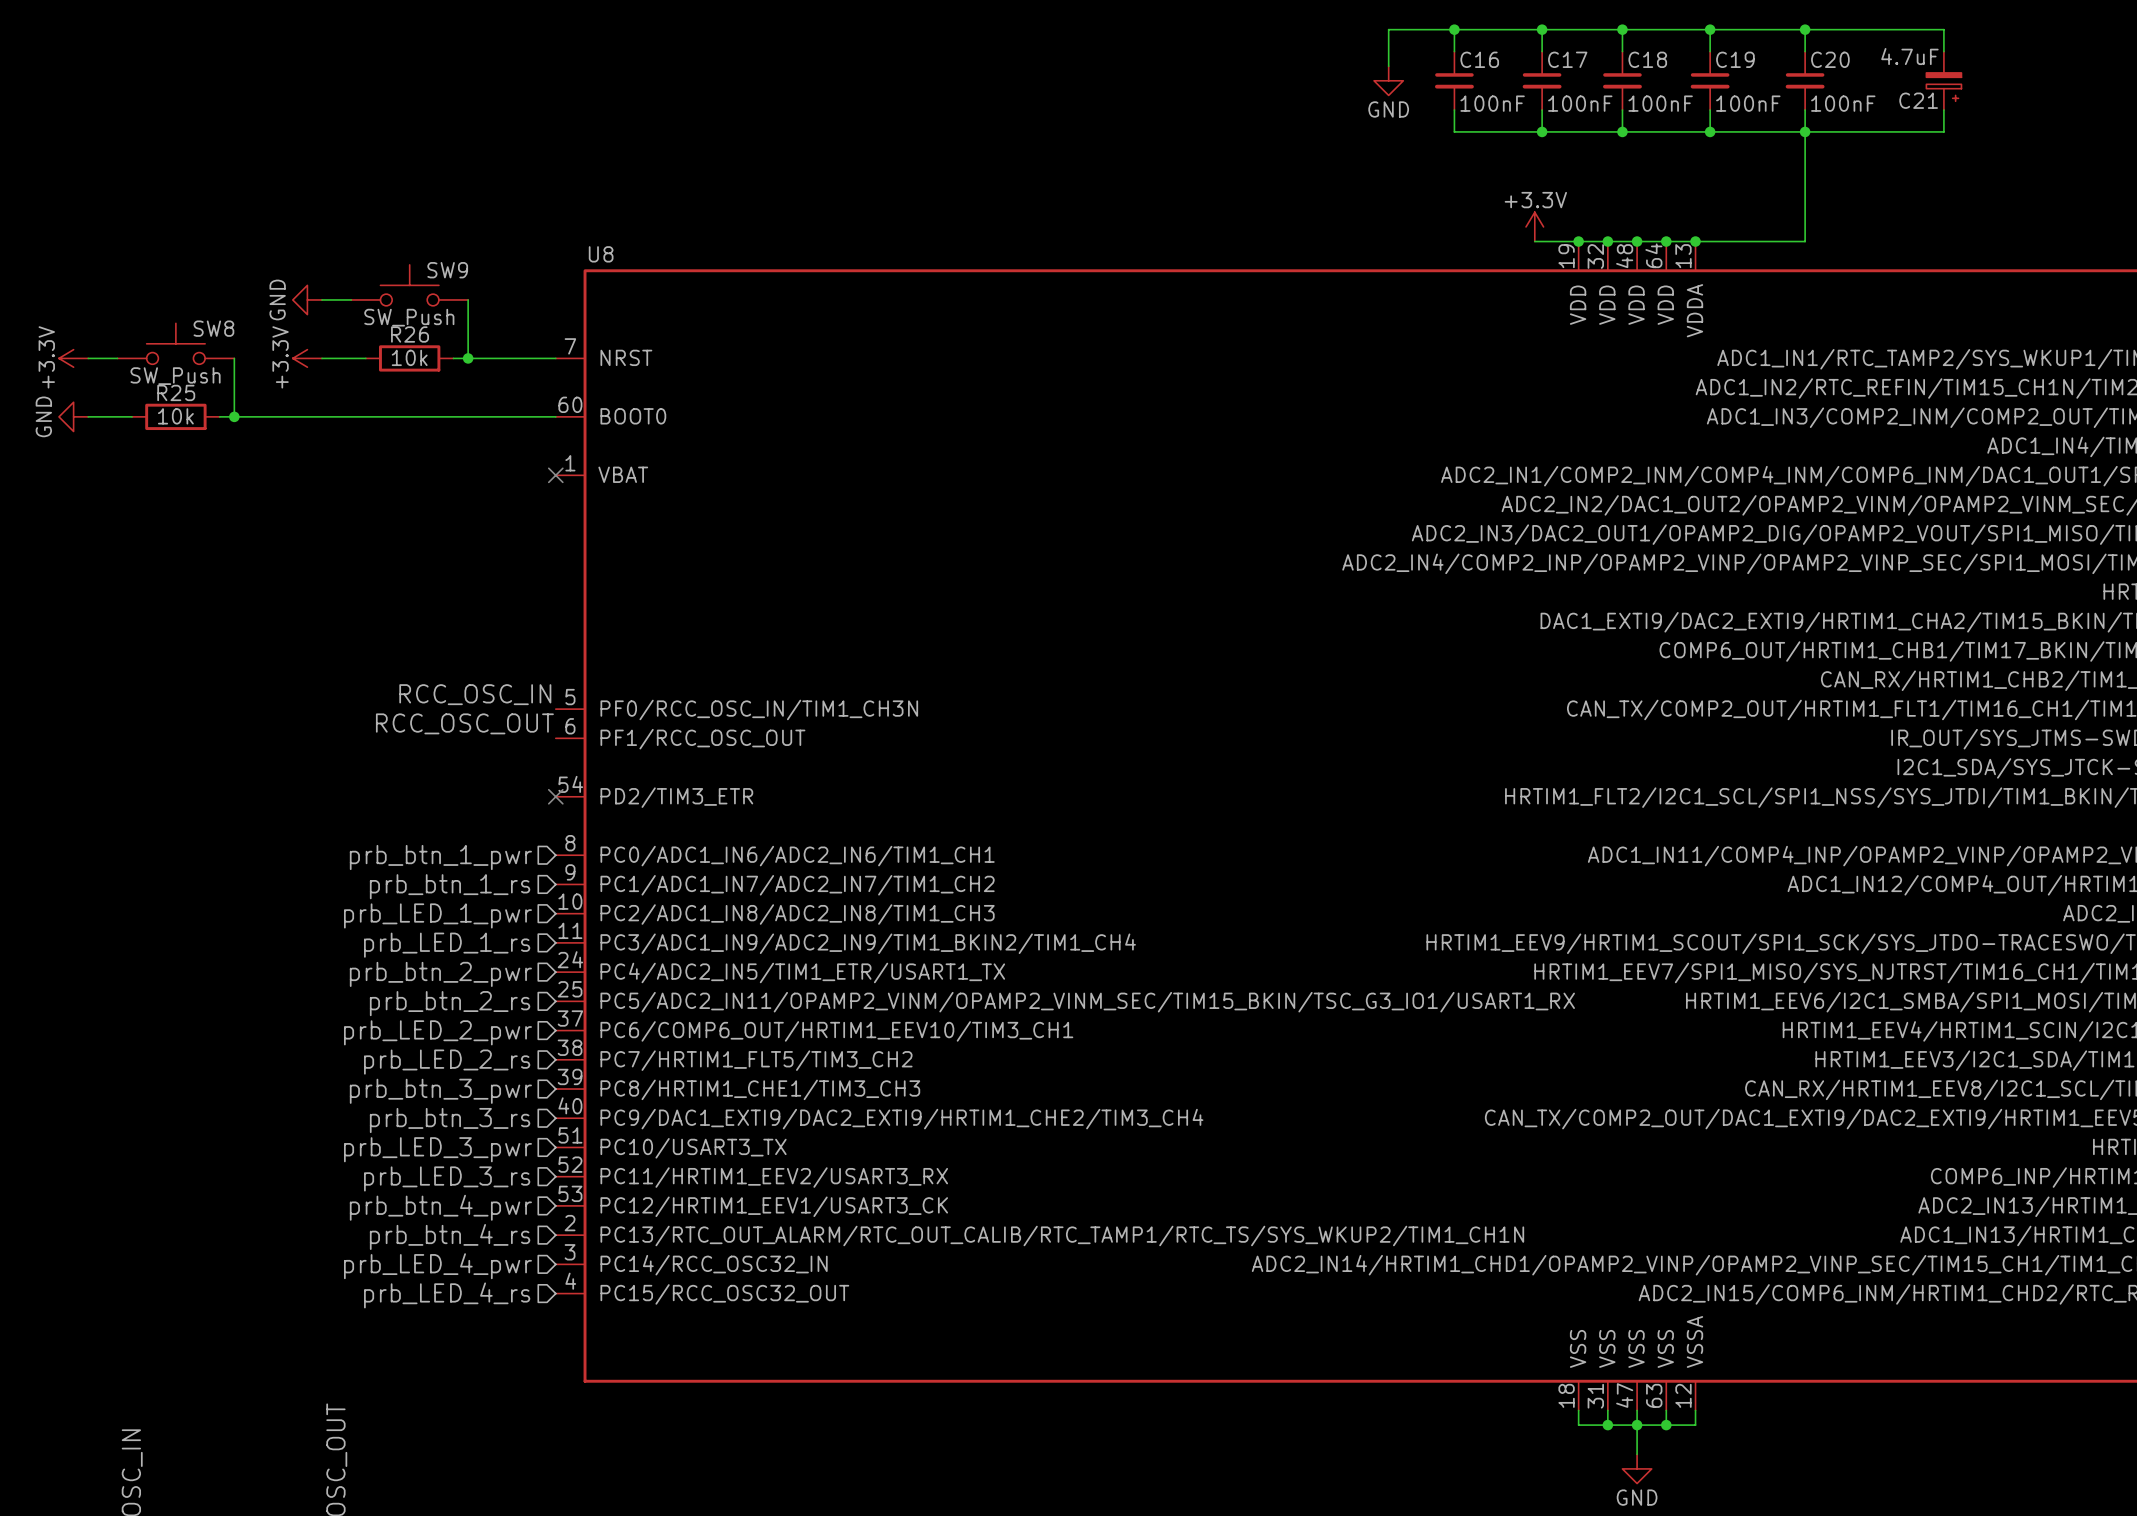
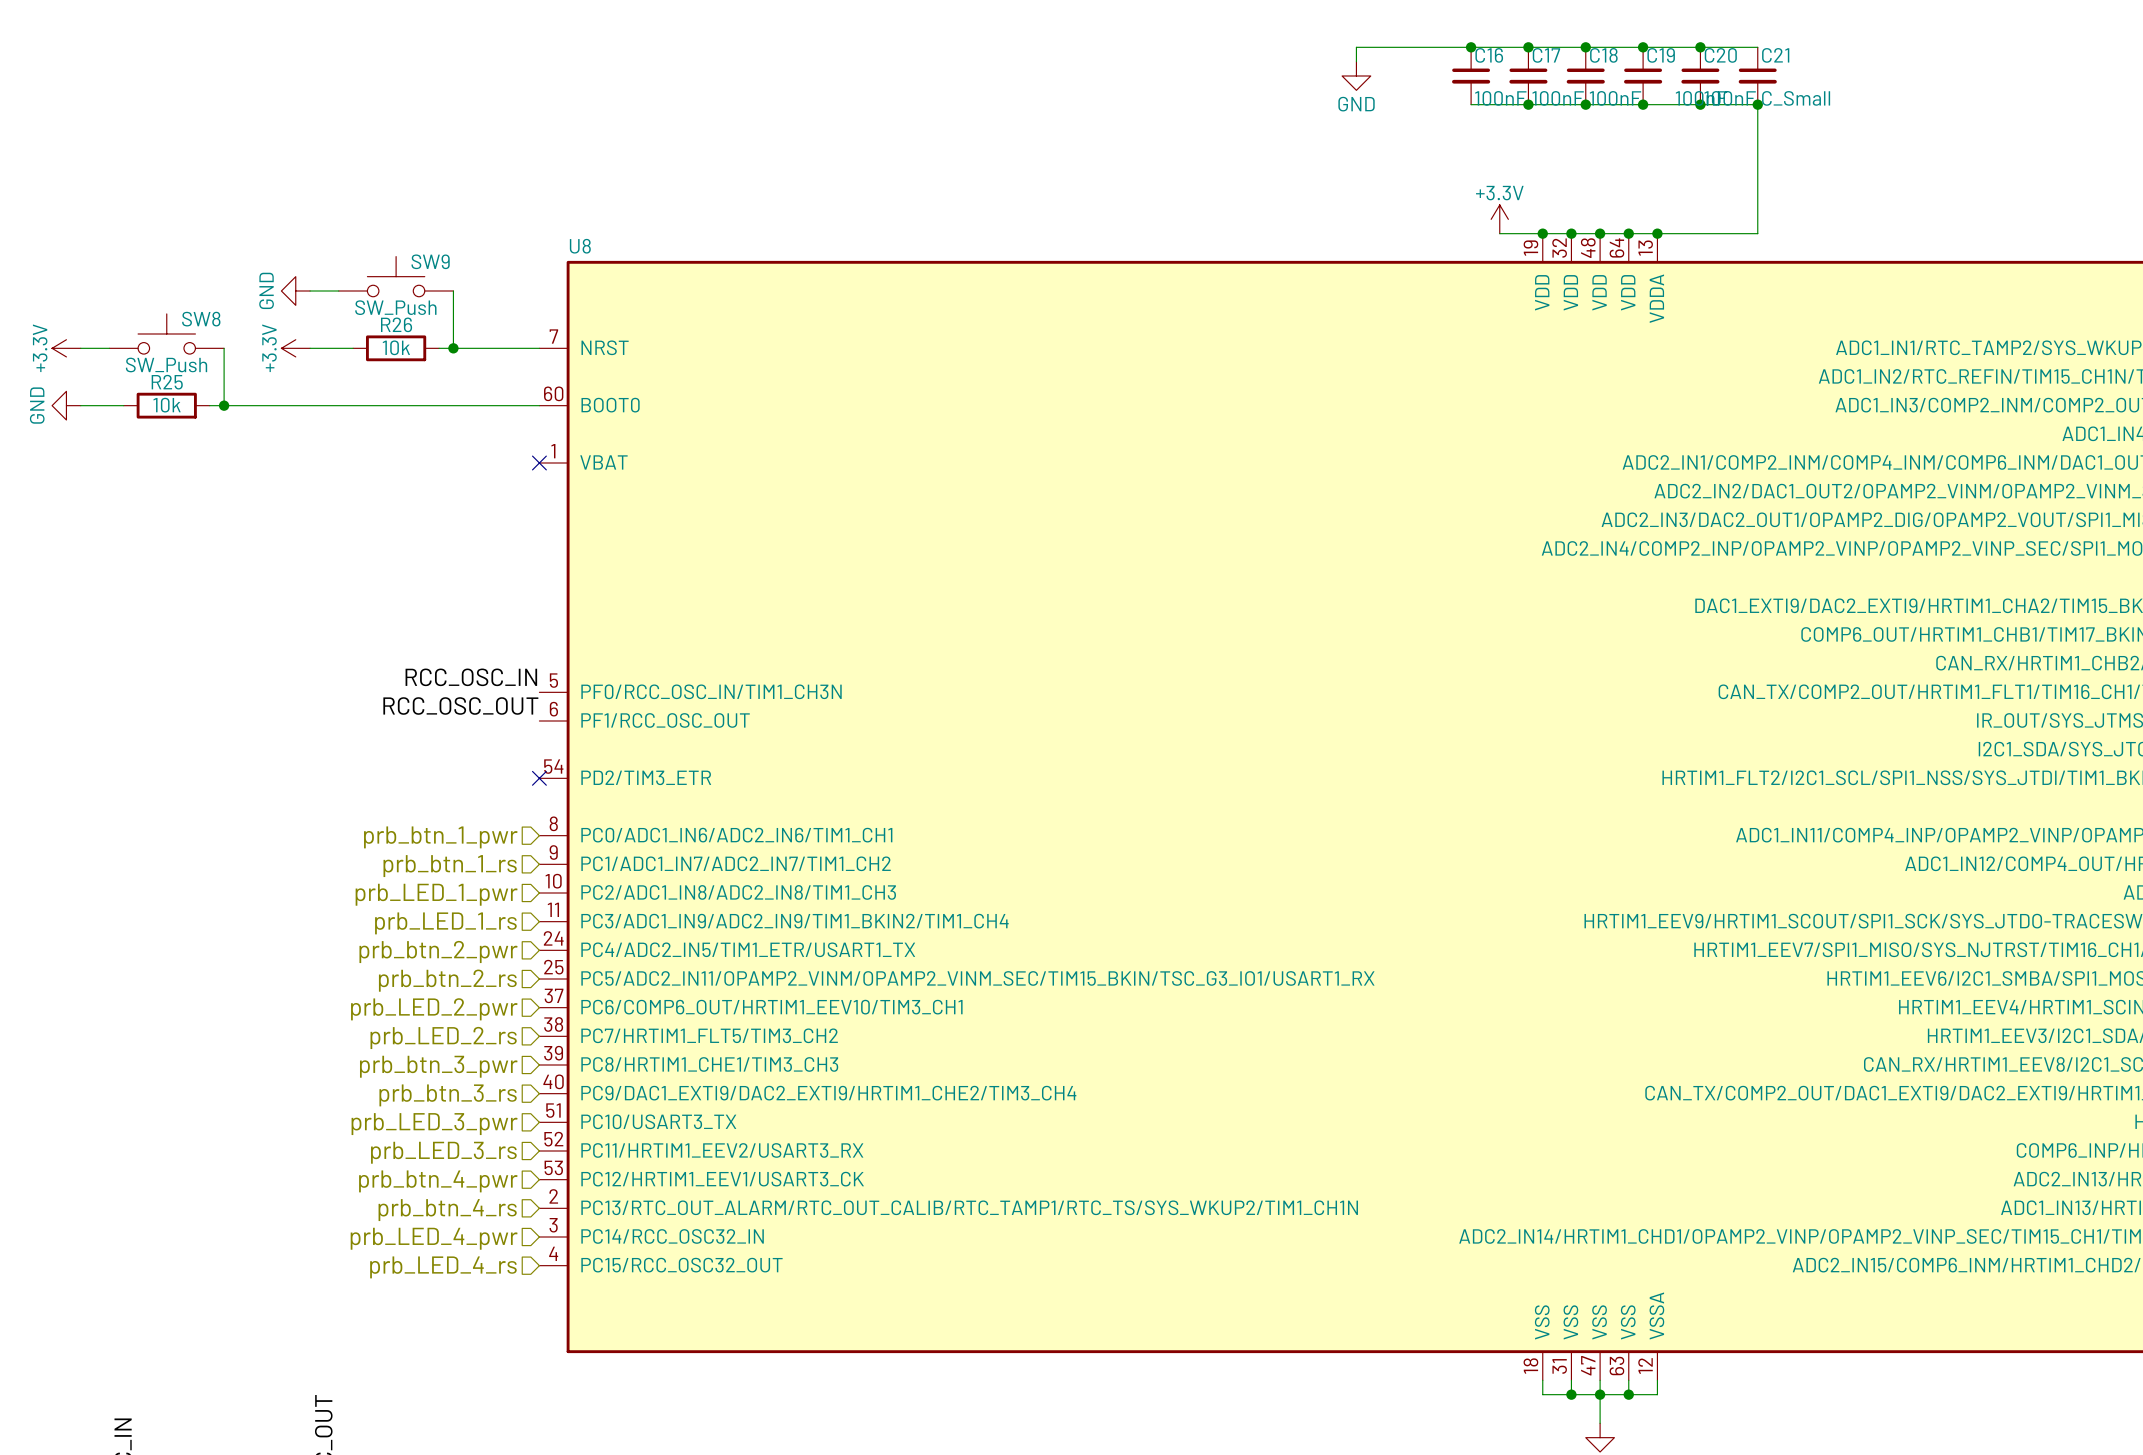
wire: (1454, 29) (1454, 51) -> none
junction: (1454, 29) -> none
wire: (1542, 29) (1542, 51) -> none
junction: (1542, 29) -> none
wire: (1622, 29) (1622, 51) -> none
junction position: (1622, 29) -> (1585, 47)
wire: (1710, 29) (1710, 51) -> none
junction: (1710, 29) -> none
wire: (1805, 29) (1805, 51) -> none
junction: (1805, 29) -> none
wire: (1388, 51) (1388, 29) (1943, 29) (1943, 51) -> (1356, 47) (1757, 47)
junction: none -> (1471, 47)
junction: none -> (1528, 47)
junction: none -> (1643, 47)
junction: none -> (1700, 47)
C21 symbol: [1926, 51, 1962, 111] -> [1738, 47, 1777, 105]
C21 value: 4.7uF (1909, 56) -> C_Small (1796, 98)
C16 position: (1454, 80) -> (1471, 76)
C17 position: (1542, 80) -> (1528, 76)
C19 position: (1710, 80) -> (1643, 76)
C20 position: (1805, 80) -> (1700, 76)
C21 name position: C21 (1918, 100) -> C21 (1775, 55)
wire: (1454, 110) (1454, 131) (1943, 131) (1943, 110) -> none
wire: (1542, 110) (1542, 131) -> none
wire: (1622, 110) (1622, 131) -> none
junction: none -> (1643, 104)
wire: (1710, 110) (1710, 131) -> none
junction: none -> (1700, 104)
wire: (1805, 110) (1805, 241) (1797, 241) -> (1471, 104) (1757, 104) (1757, 233)
junction position: (1542, 131) -> (1528, 104)
junction position: (1622, 131) -> (1585, 104)
junction: (1710, 131) -> none
junction position: (1805, 131) -> (1757, 104)

